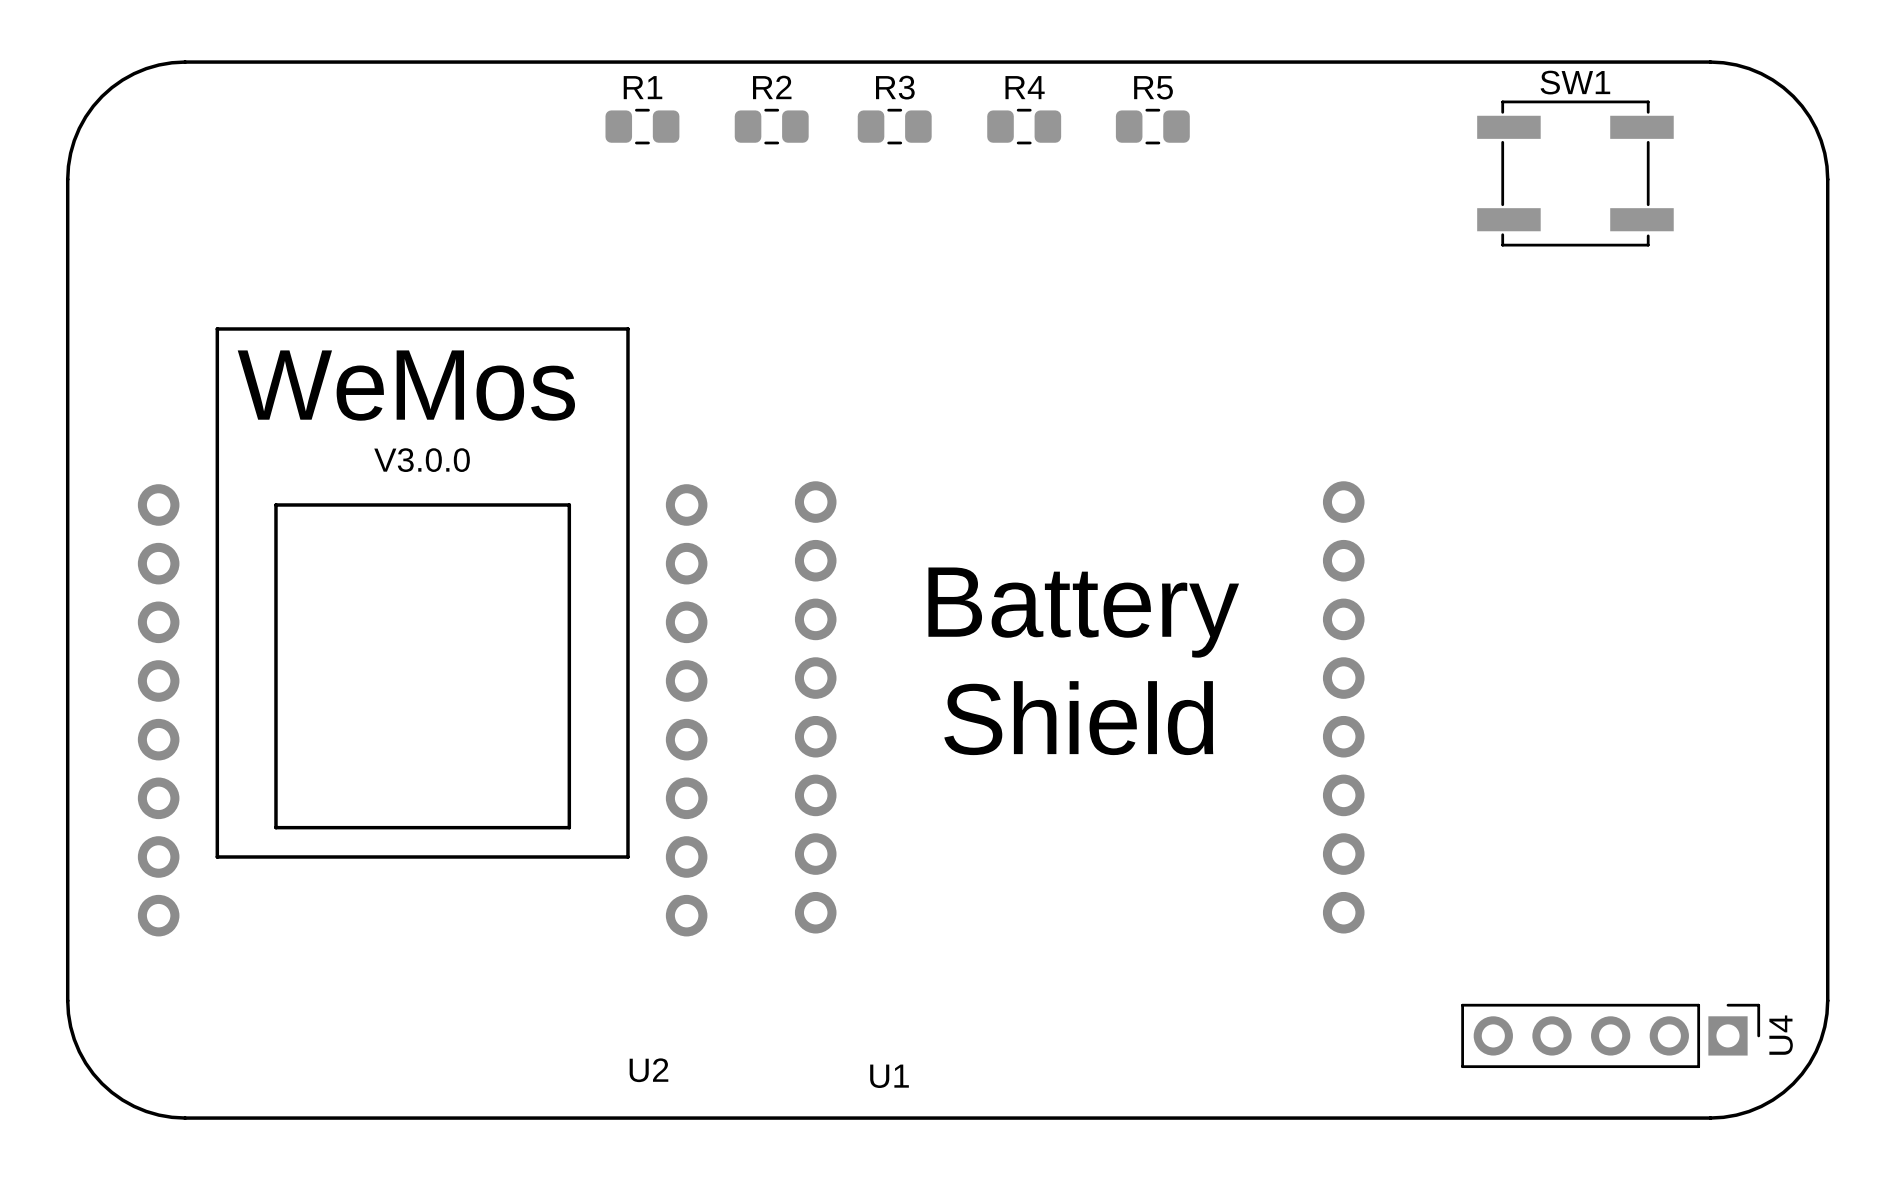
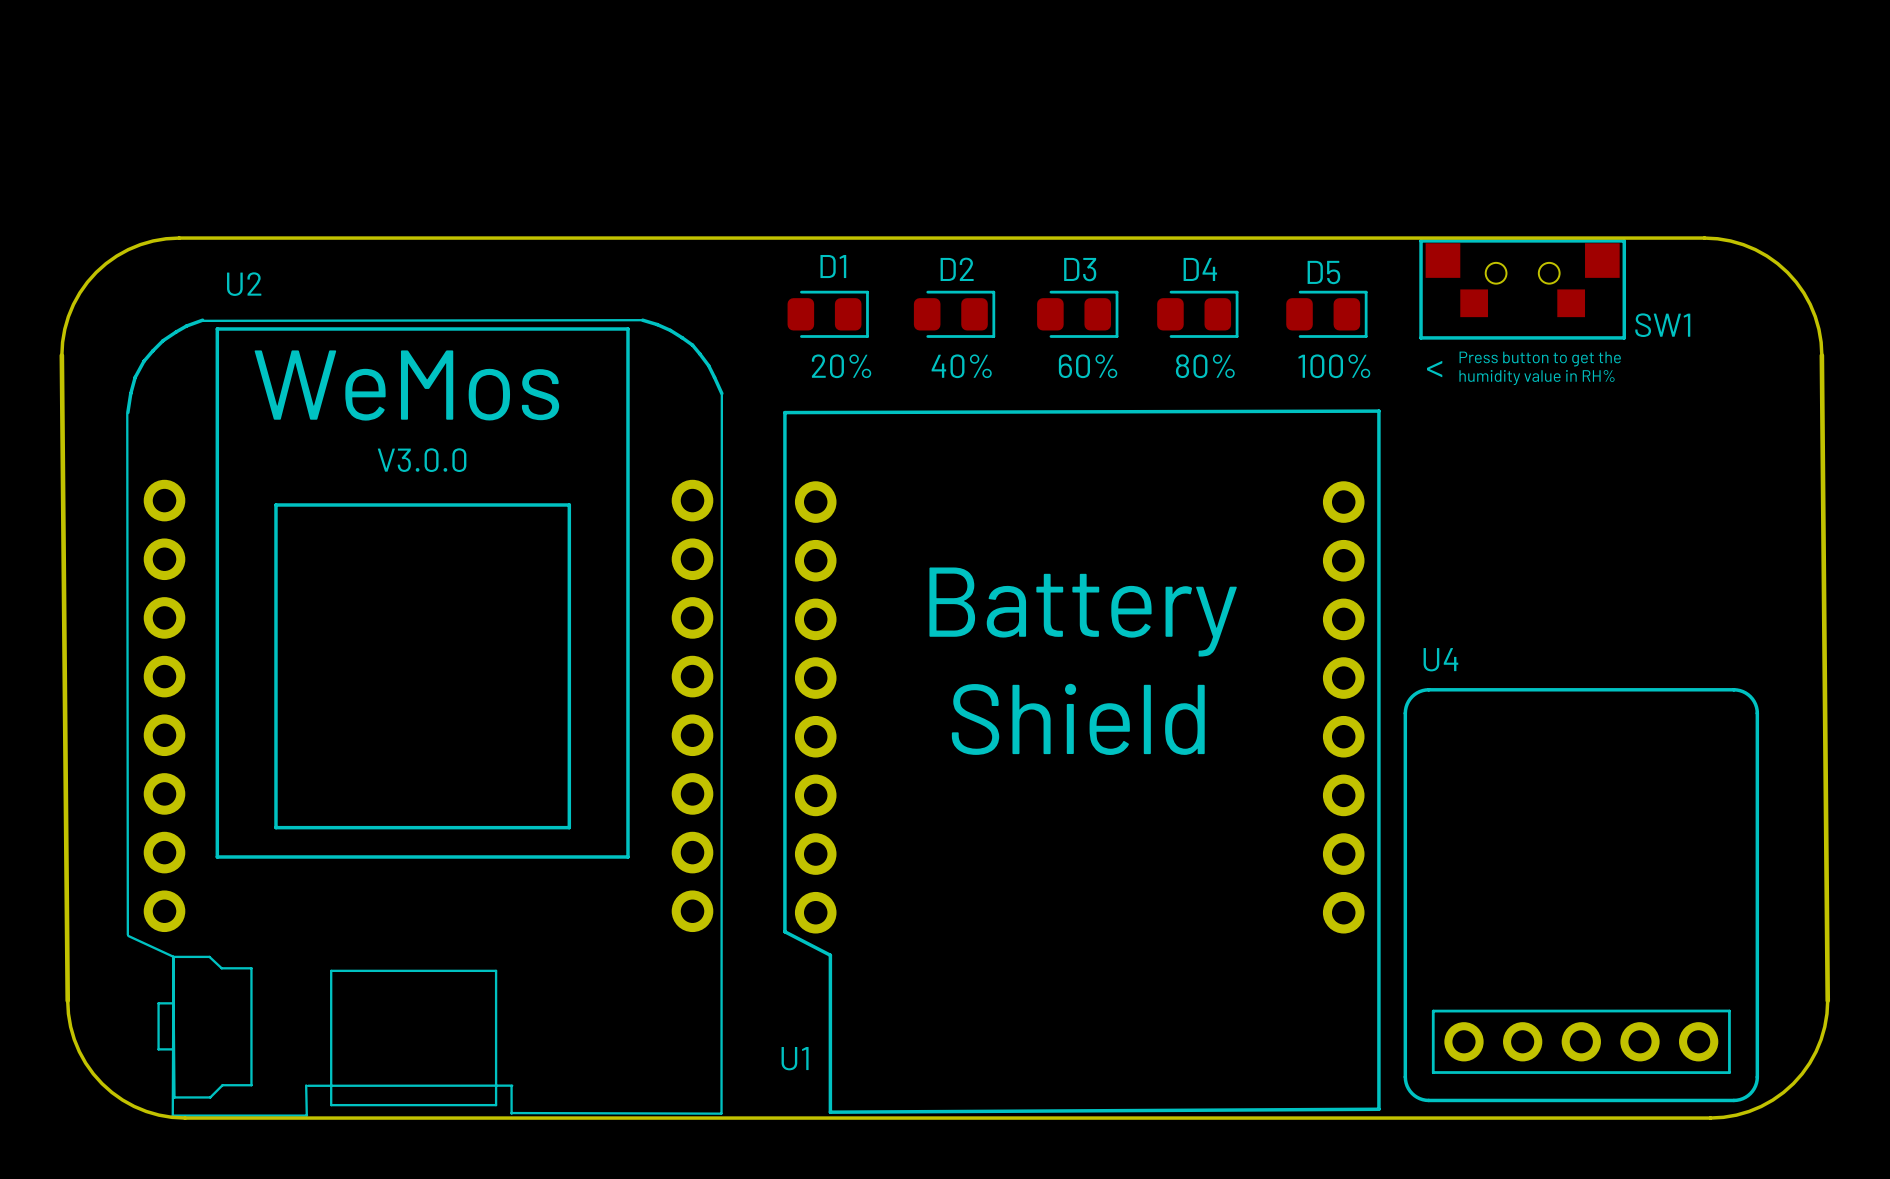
SW1 name position: SW1 (1575, 82) -> SW1 (1662, 325)
SW1 footprint: [1477, 100, 1674, 247] -> [1419, 239, 1627, 340]
R1: (642, 126) -> none
R2: (771, 126) -> none
R3: (894, 126) -> none
R4: (1024, 126) -> none
R5: (1152, 126) -> none
D1: none -> (828, 314)
D2: none -> (954, 314)
D3: none -> (1077, 314)
D4: none -> (1197, 314)
D5: none -> (1326, 314)
U2 footprint: [137, 327, 708, 937] -> [126, 318, 724, 1117]
text: none -> Press button to get the (1540, 359)
text: none -> 20% (841, 366)
text: none -> 40% (961, 366)
text: none -> 60% (1088, 366)
text: none -> 80% (1205, 366)
text: none -> 100% (1334, 366)
text: none -> < (1434, 369)
text: none -> humidity value in RH% (1537, 377)
U1 footprint: [794, 481, 1365, 934] -> [783, 409, 1381, 1114]
board edge: (67, 1000) (68, 166) (79, 128) (102, 96) (134, 73) (158, 64) (185, 62) (1710, 62) (1736, 64) (1772, 80) (1793, 96) (1809, 116) (1821, 140) (1826, 166) (1827, 1000) -> (67, 1000) (62, 342) (73, 304) (96, 272) (128, 249) (153, 240) (179, 238) (1704, 238) (1730, 240) (1755, 249) (1777, 263) (1803, 292) (1815, 316) (1821, 342) (1827, 1000)
U4 footprint: [1461, 1003, 1761, 1069] -> [1403, 688, 1760, 1103]
U4 name position: U4 (1781, 1035) -> U4 (1440, 659)
U2 name position: U2 (648, 1070) -> U2 (244, 284)
U1 name position: U1 (889, 1076) -> U1 (795, 1058)

